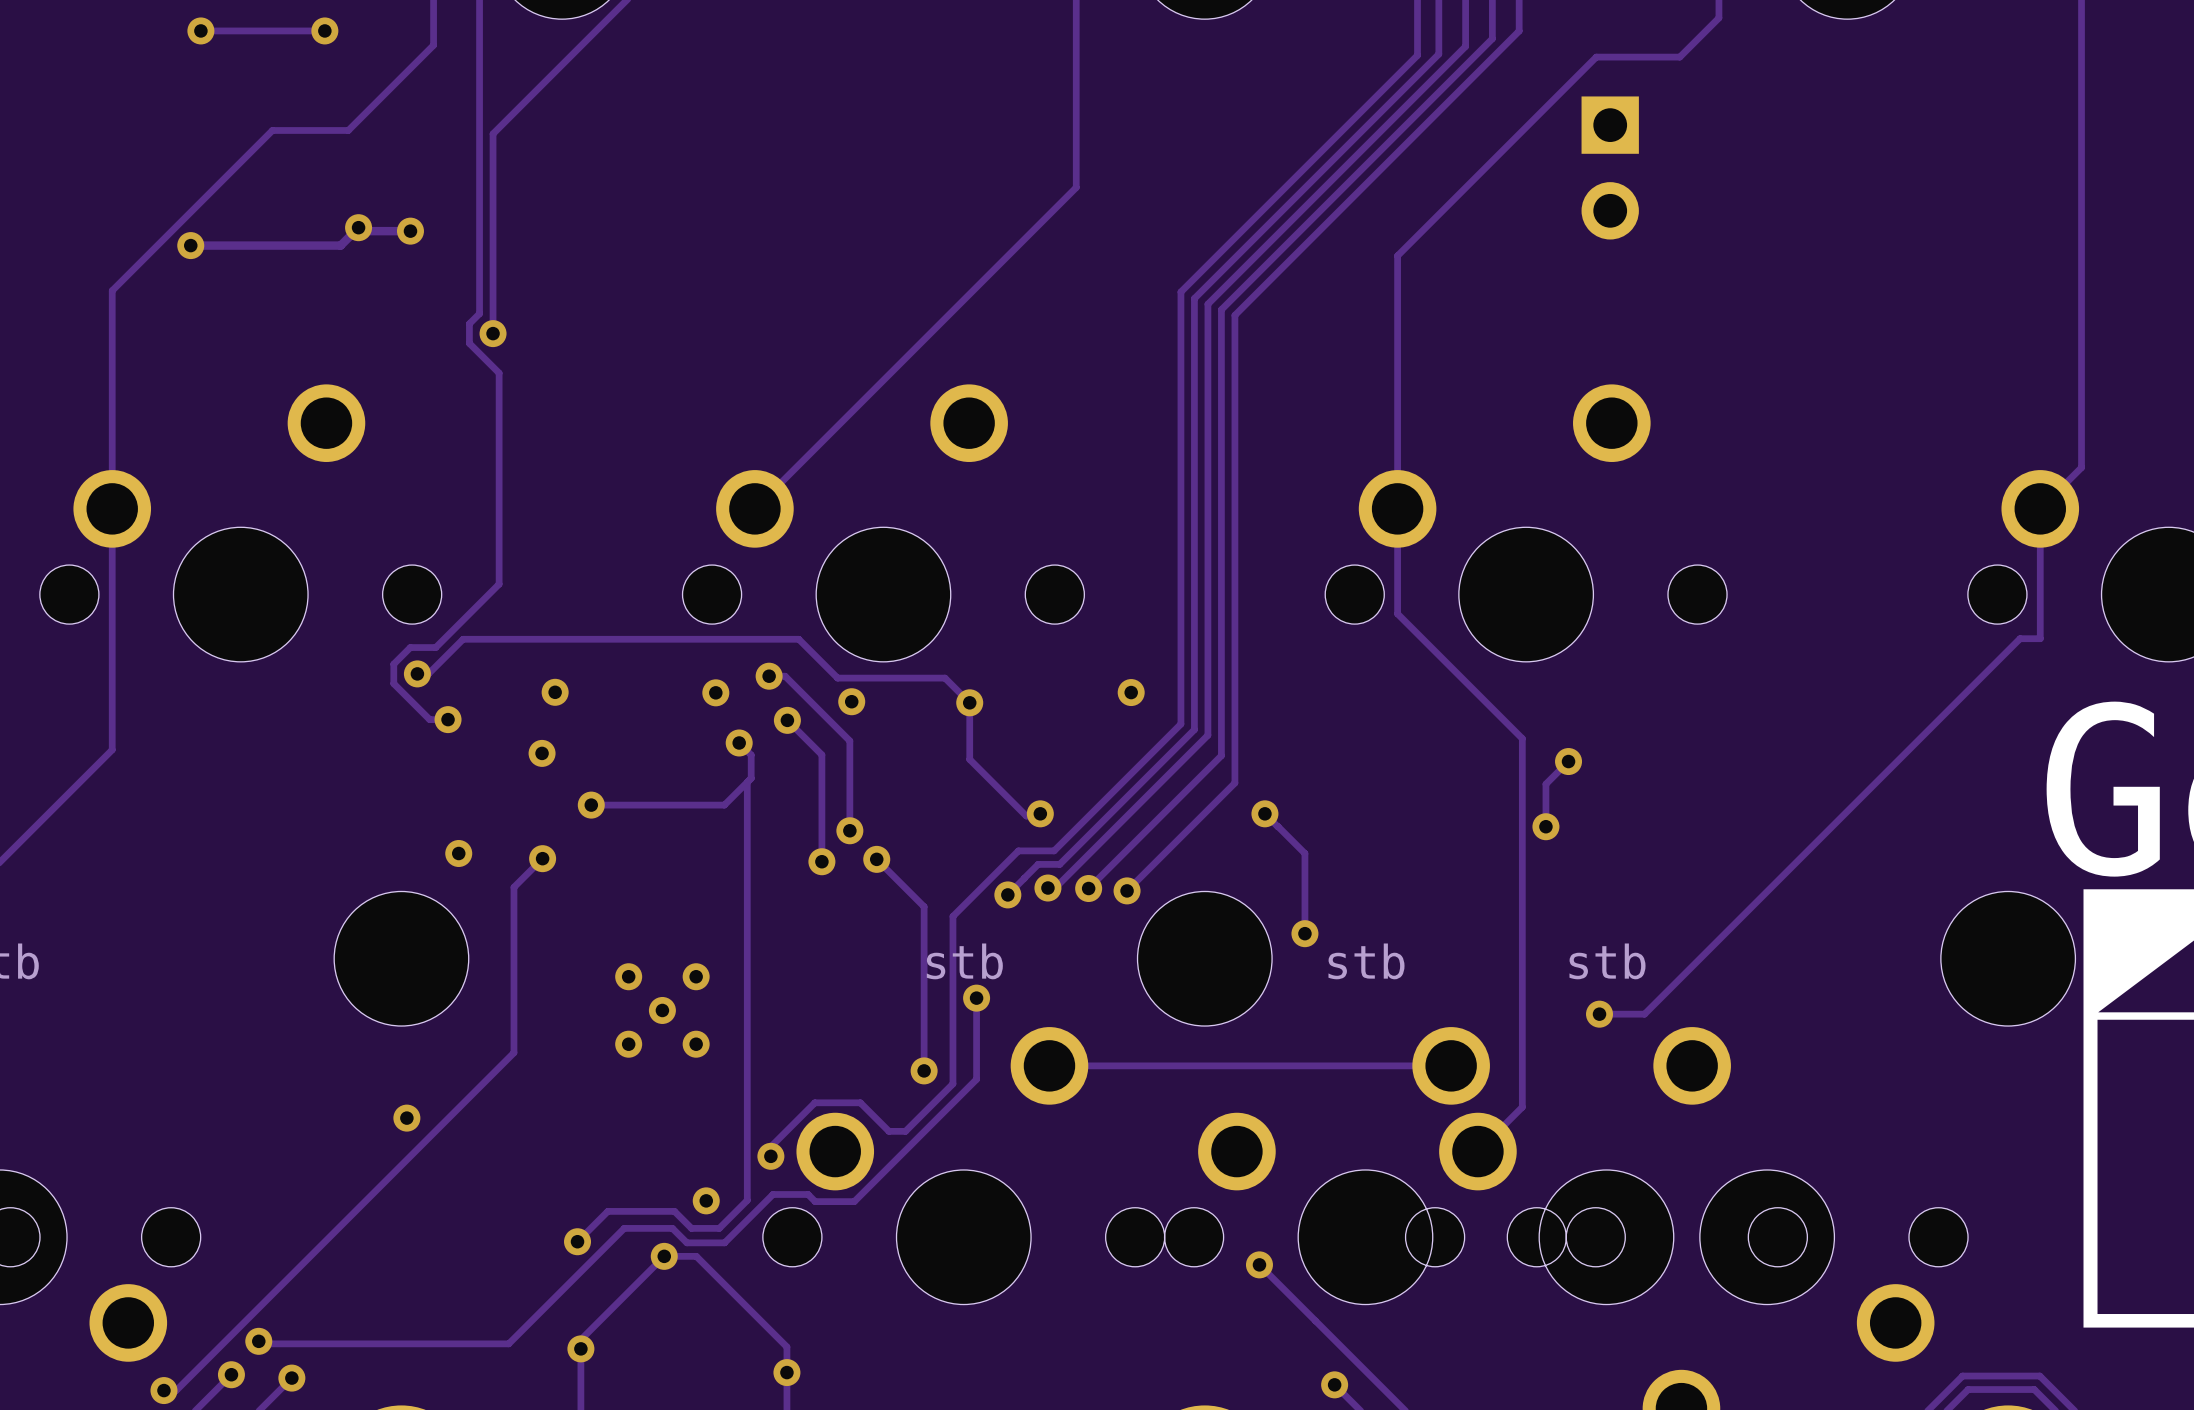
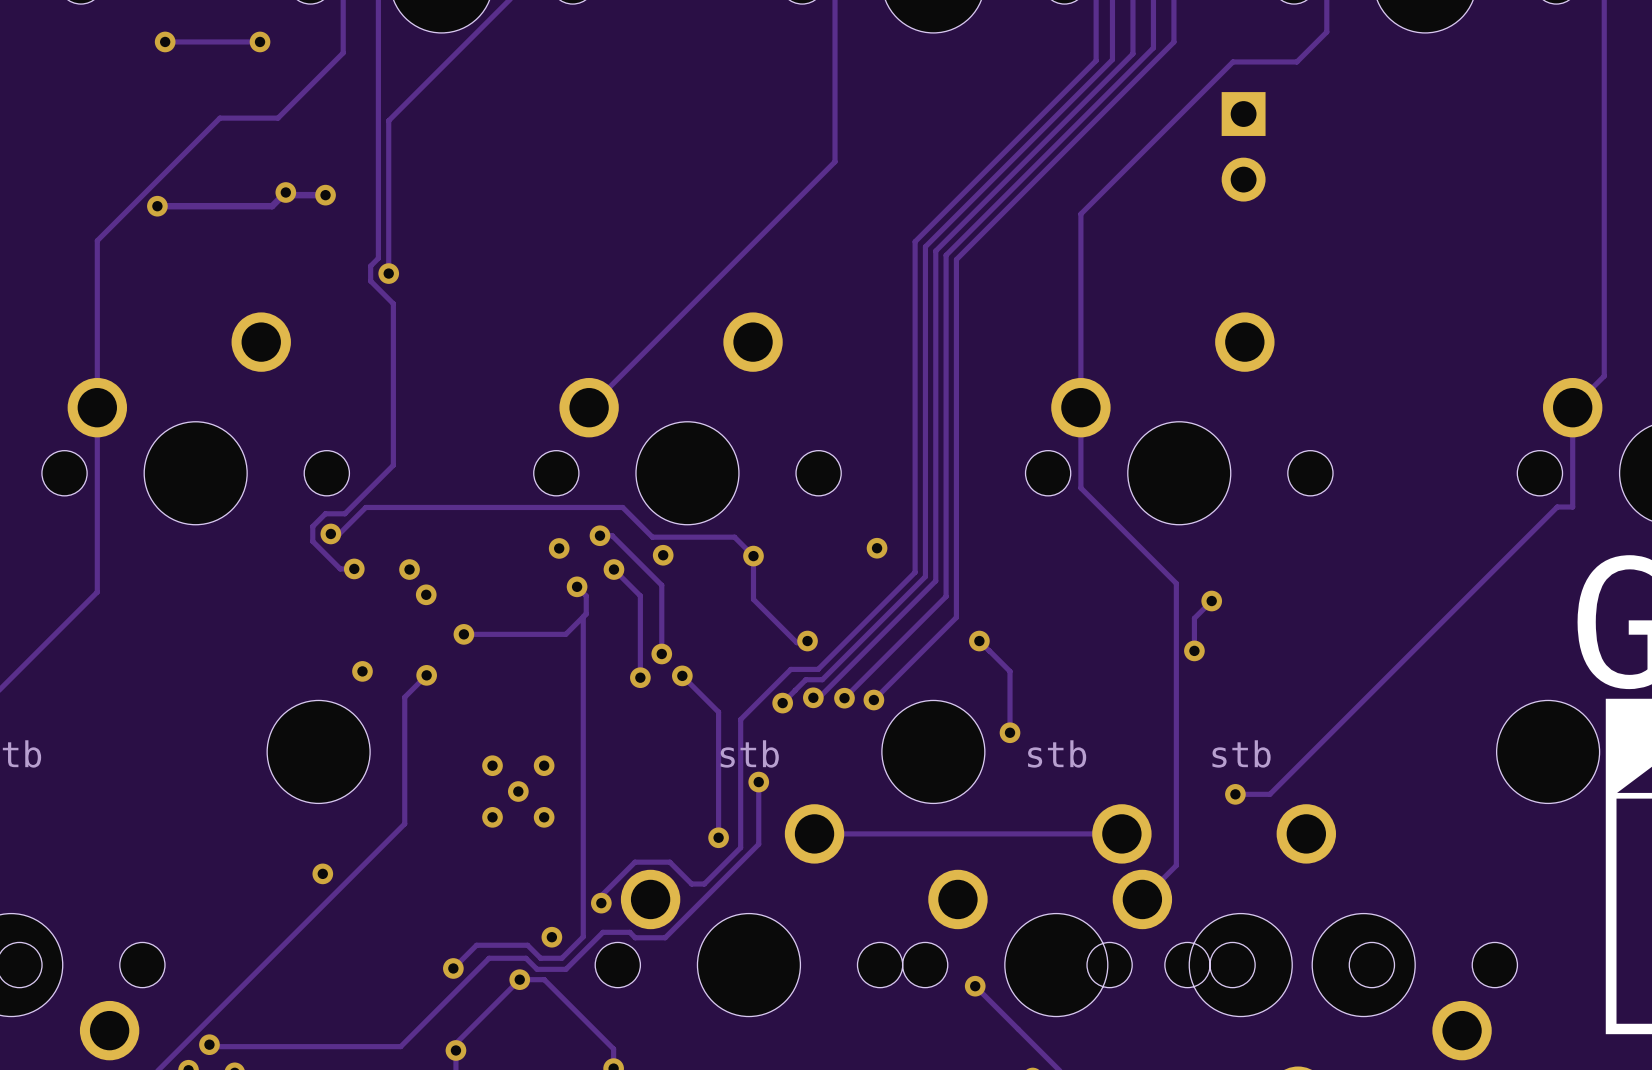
via position: (555, 692) -> (409, 569)

